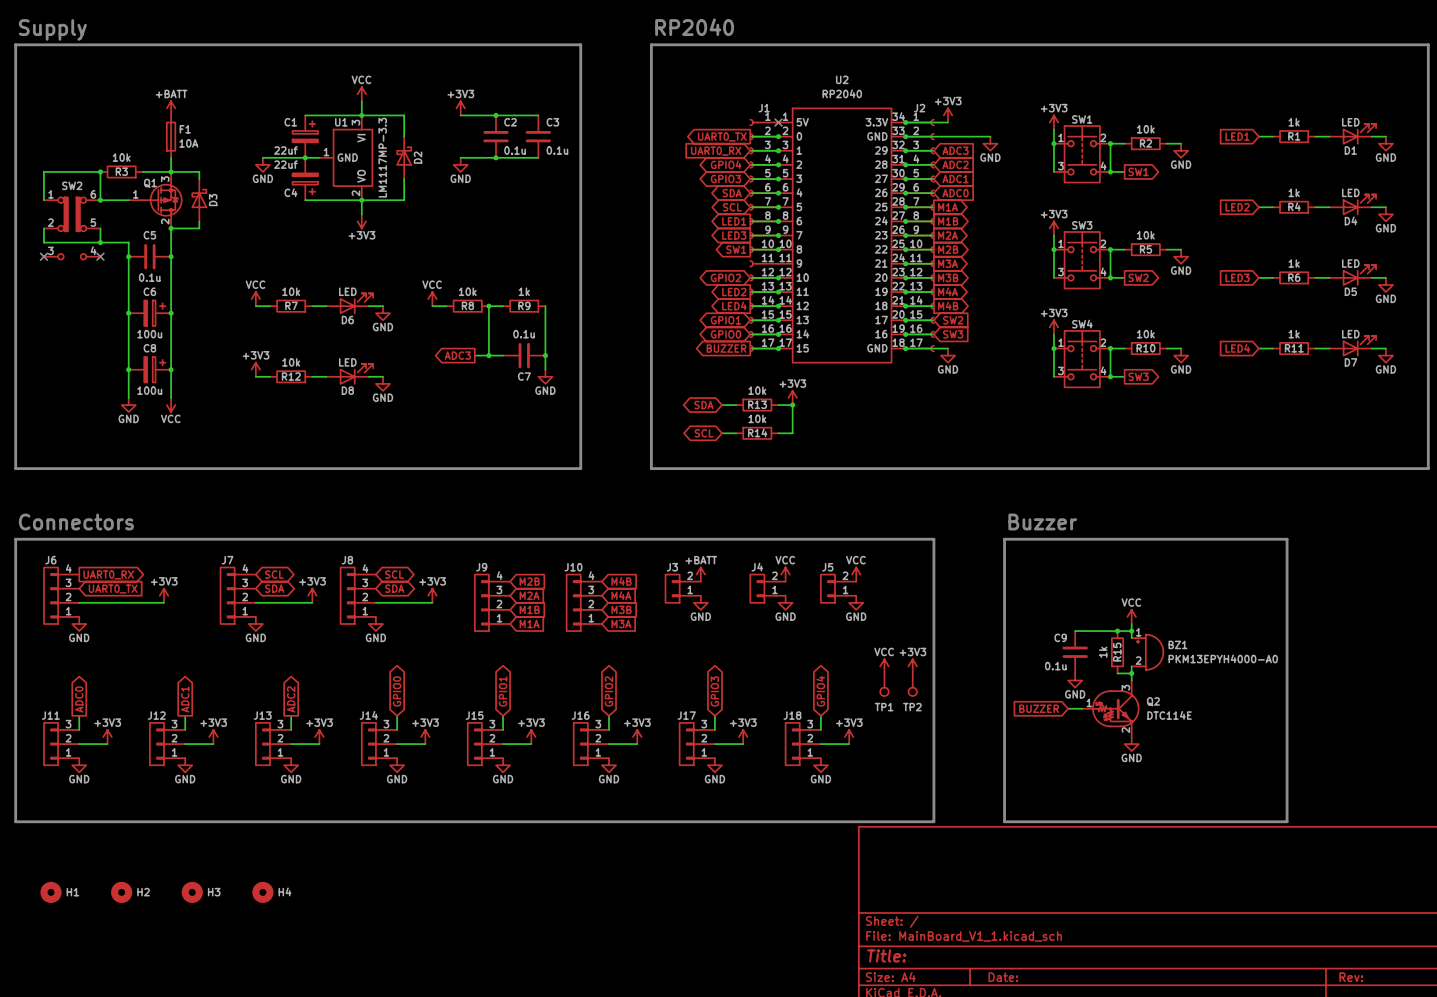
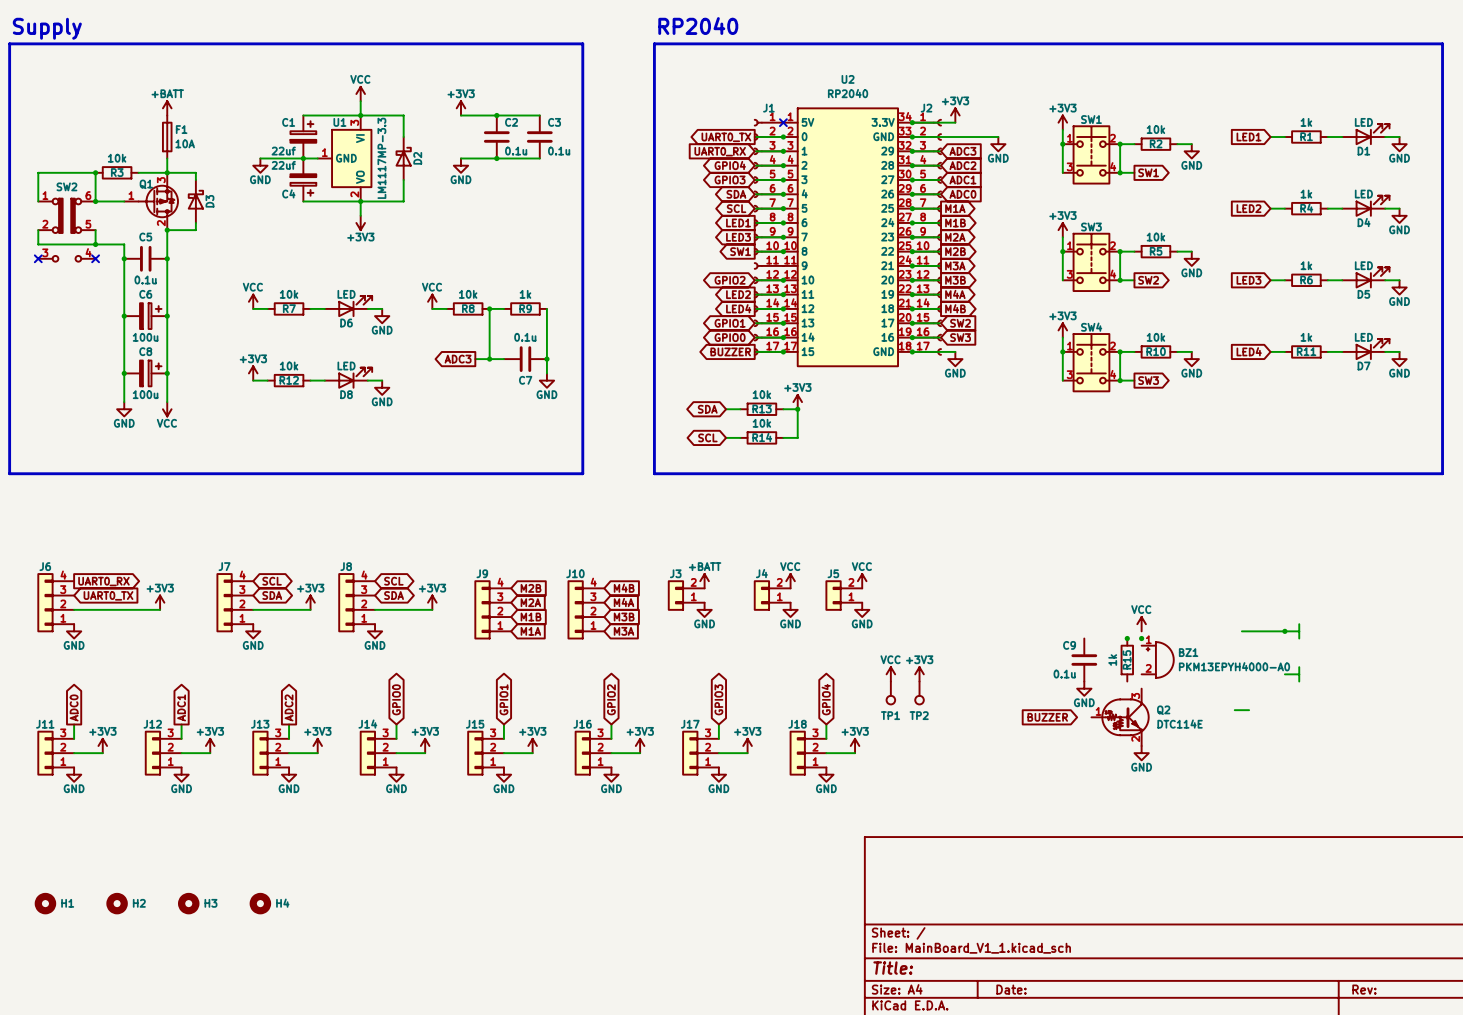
text: Connectors (76, 522) -> none
text: Buzzer (1042, 522) -> none
line: (15, 539) (933, 539) (933, 821) (15, 821) (15, 539) -> none
line: (1004, 539) (1287, 539) (1287, 821) (1004, 821) (1004, 539) -> none
wire: (1131, 624) (1131, 638) -> none
wire: none -> (1241, 631) (1299, 631)
junction: none -> (1284, 631)
wire: (1075, 631) (1131, 631) -> none
wire: (1131, 666) (1131, 680) -> none
wire: none -> (1284, 674) (1299, 674)
wire: (1117, 673) (1131, 673) -> (1234, 710) (1249, 710)
junction: (1131, 673) -> none
wire: (1068, 708) (1082, 708) -> none

